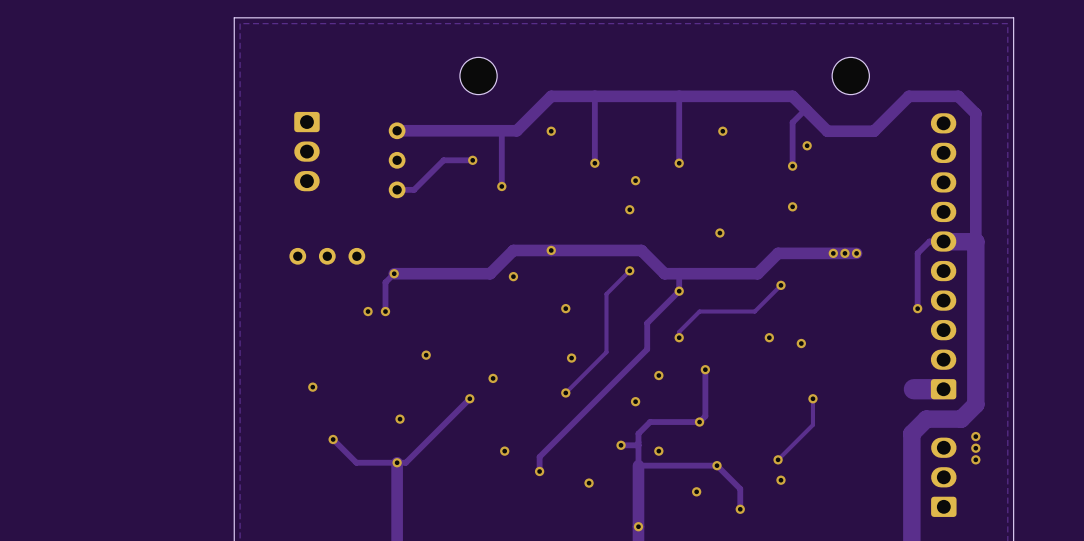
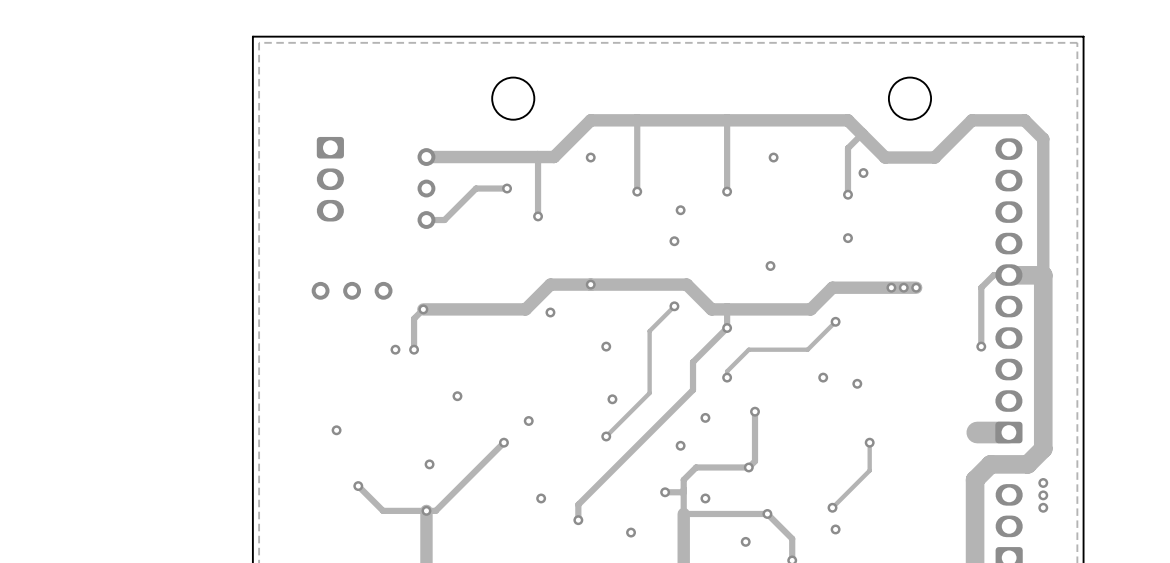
round board edge: none -> [491, 76, 535, 121]
round board edge: none -> [888, 76, 932, 121]
part: (478, 75) -> none
part: (850, 75) -> none

